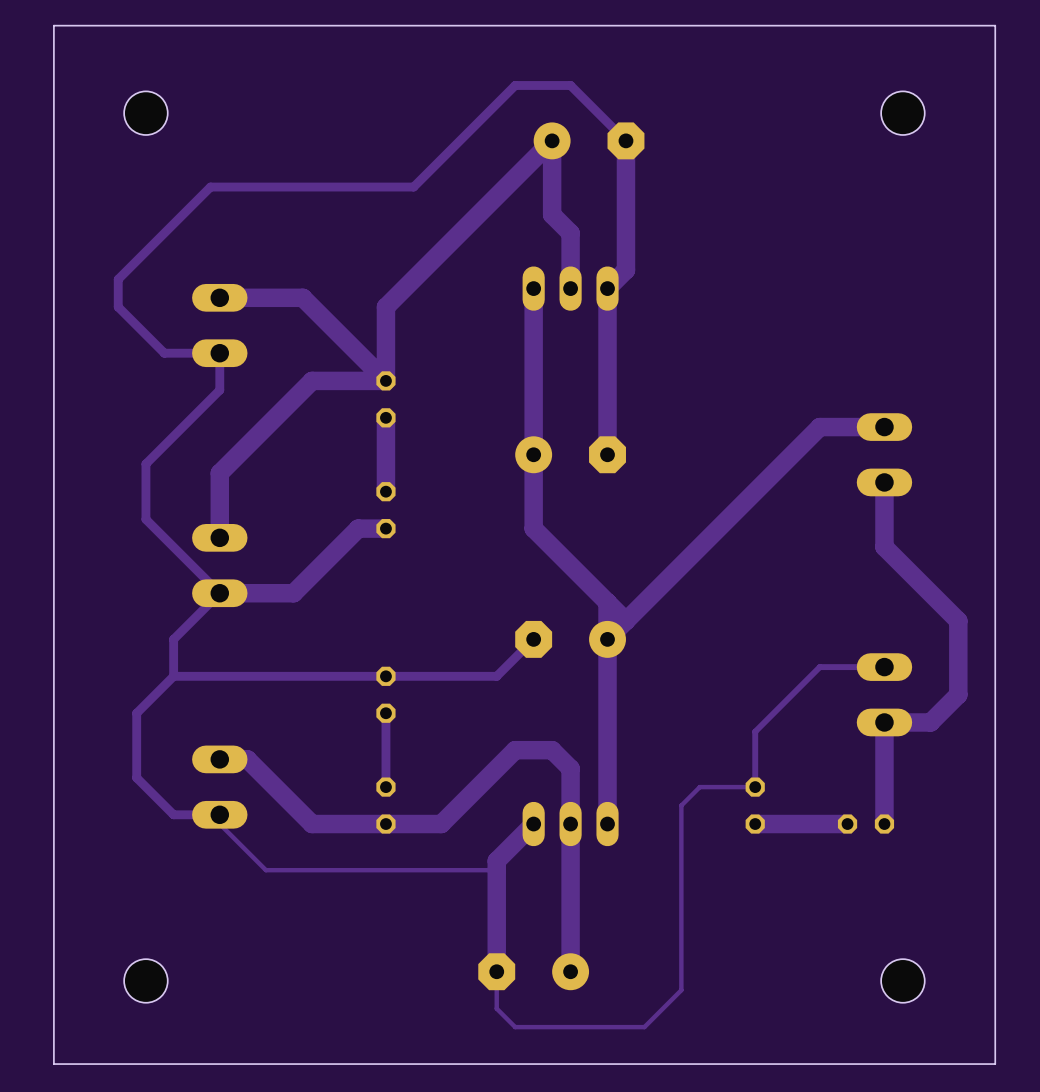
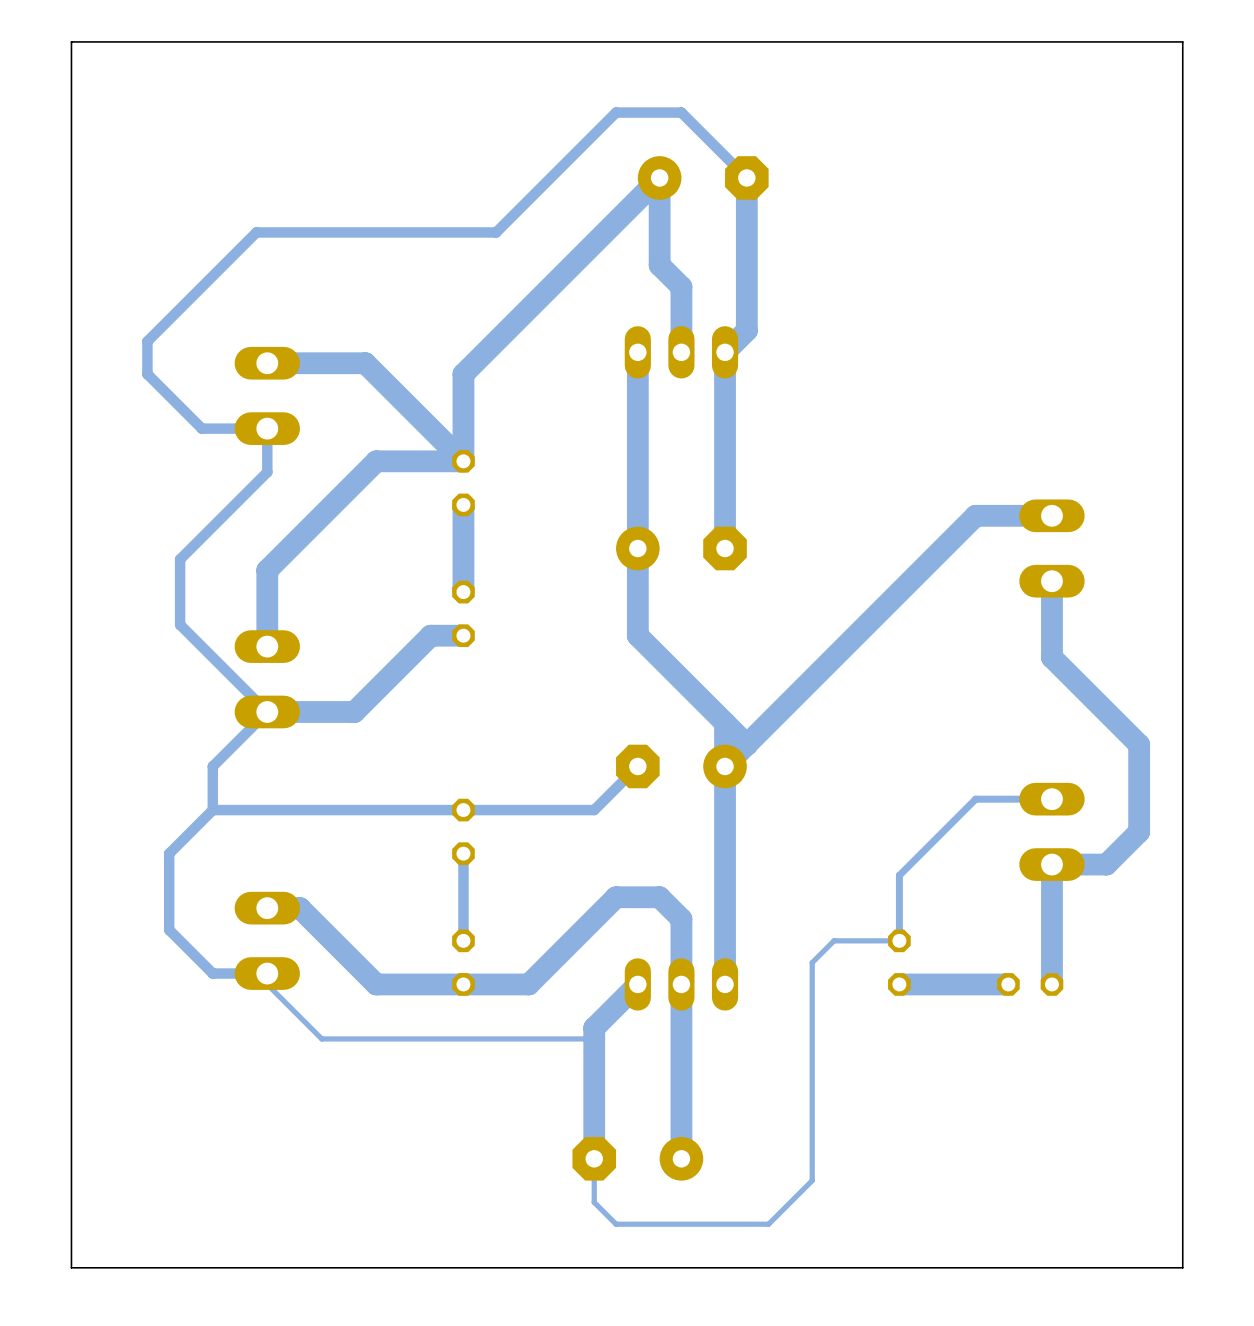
part: (145, 113) -> none
part: (902, 113) -> none
part: (145, 980) -> none
part: (902, 980) -> none

